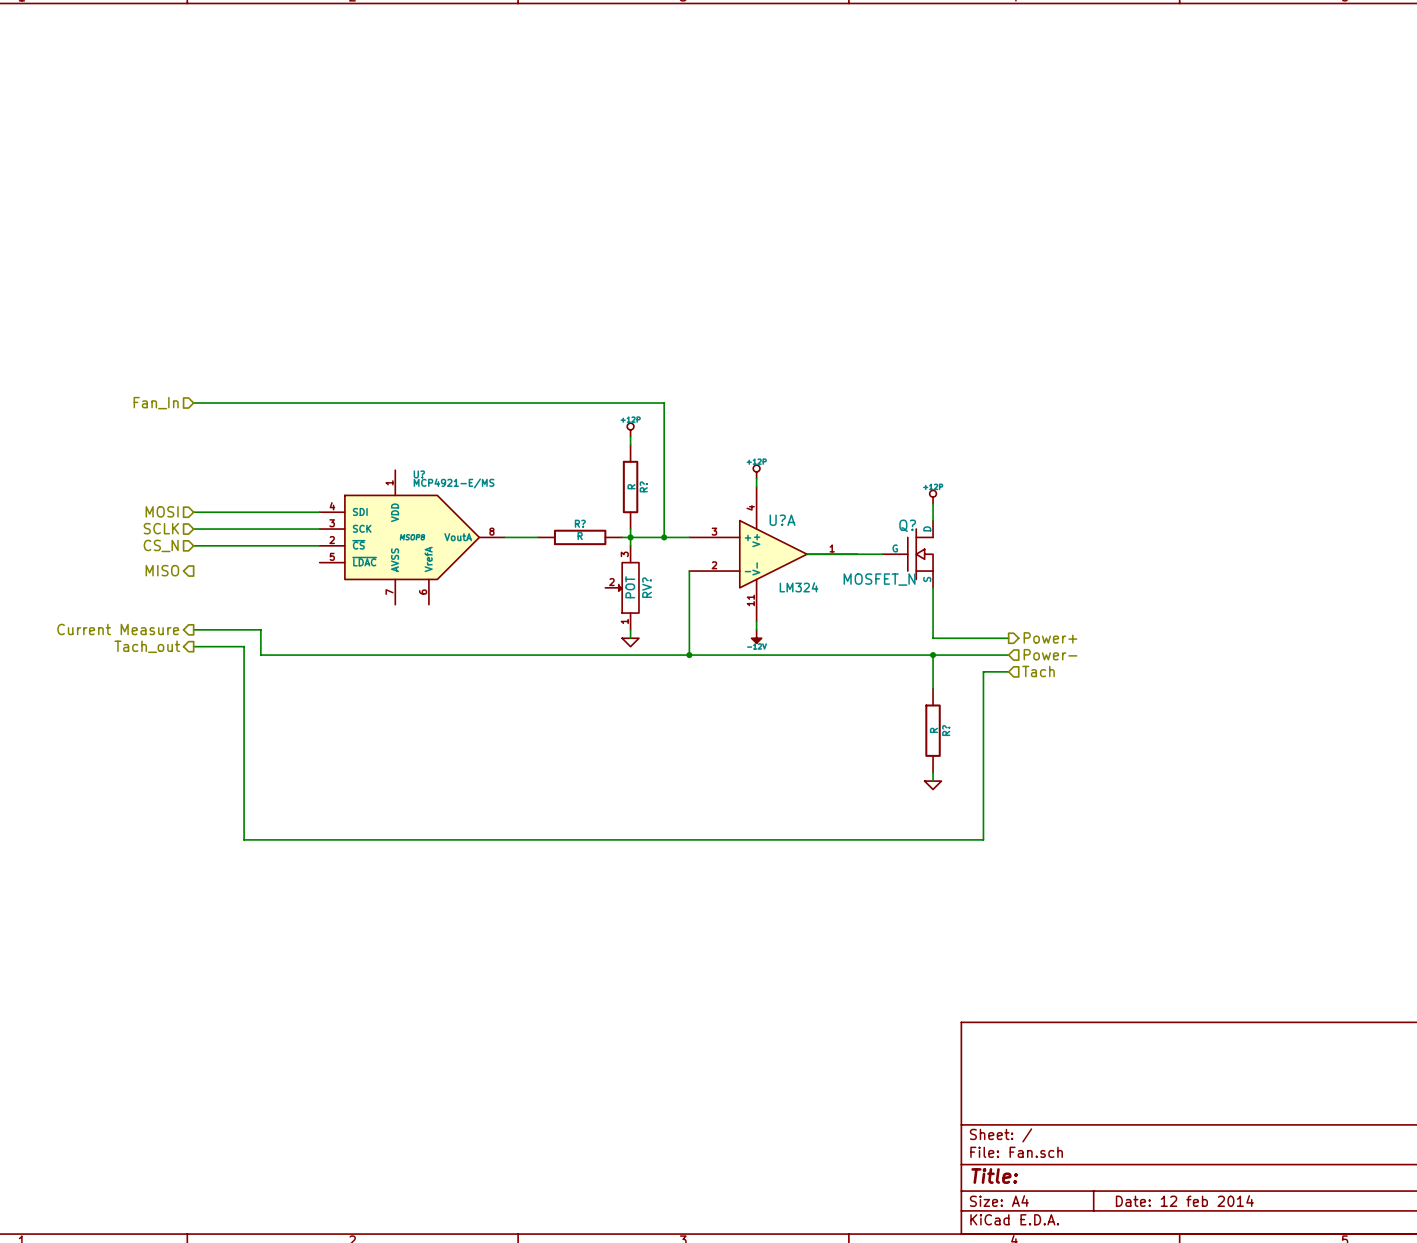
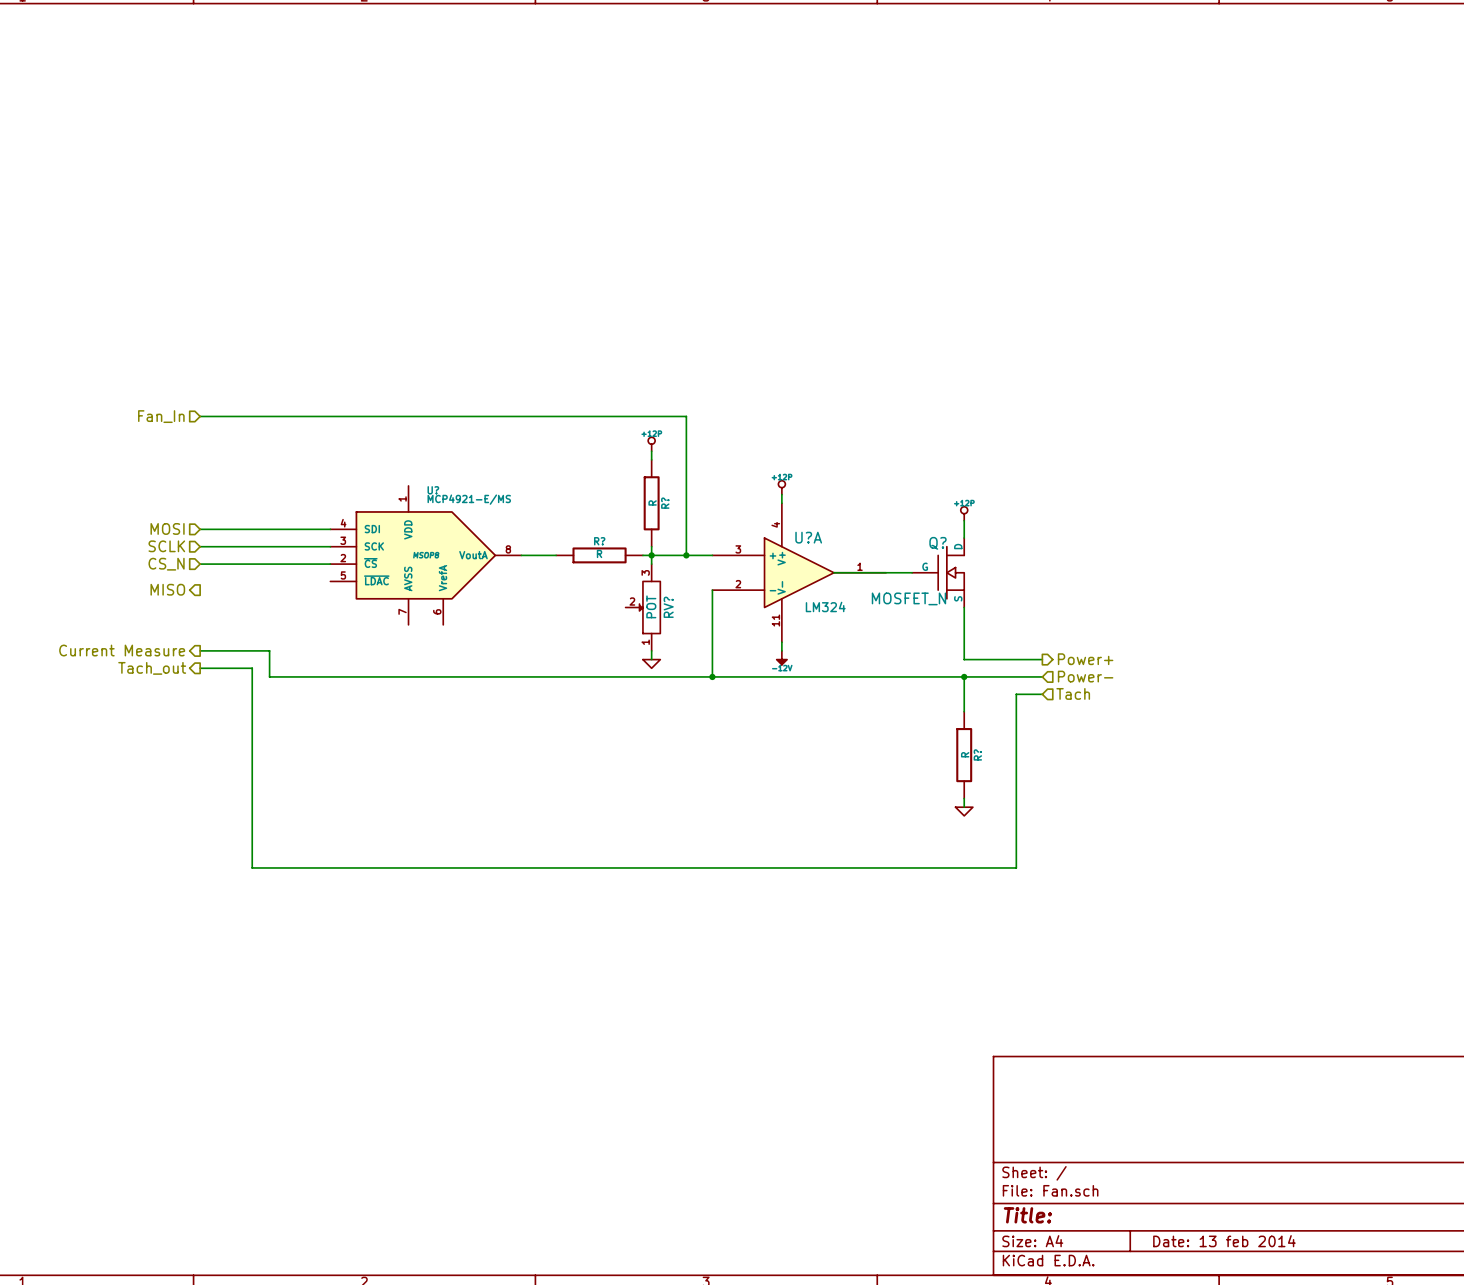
title block: Date: 12 feb 2014 (1184, 1201) -> Date: 13 feb 2014 (1224, 1241)

